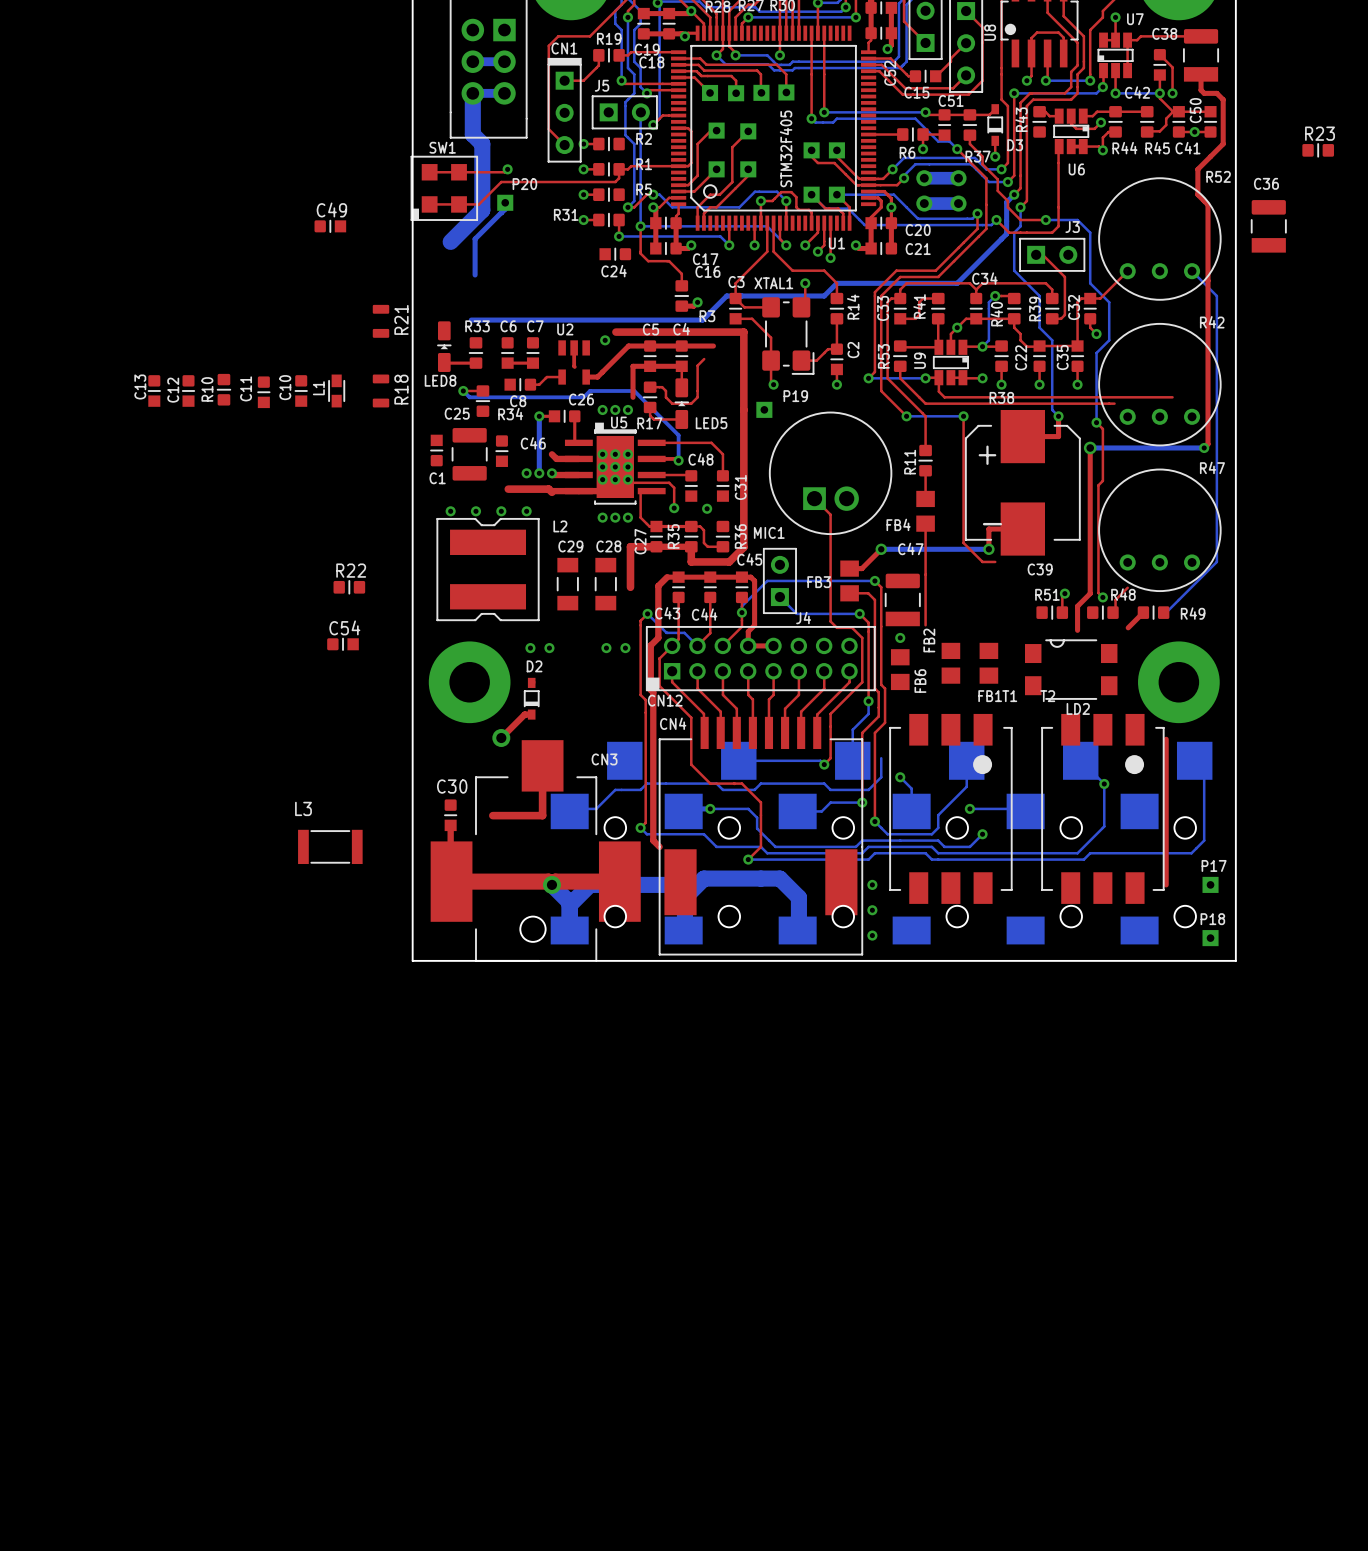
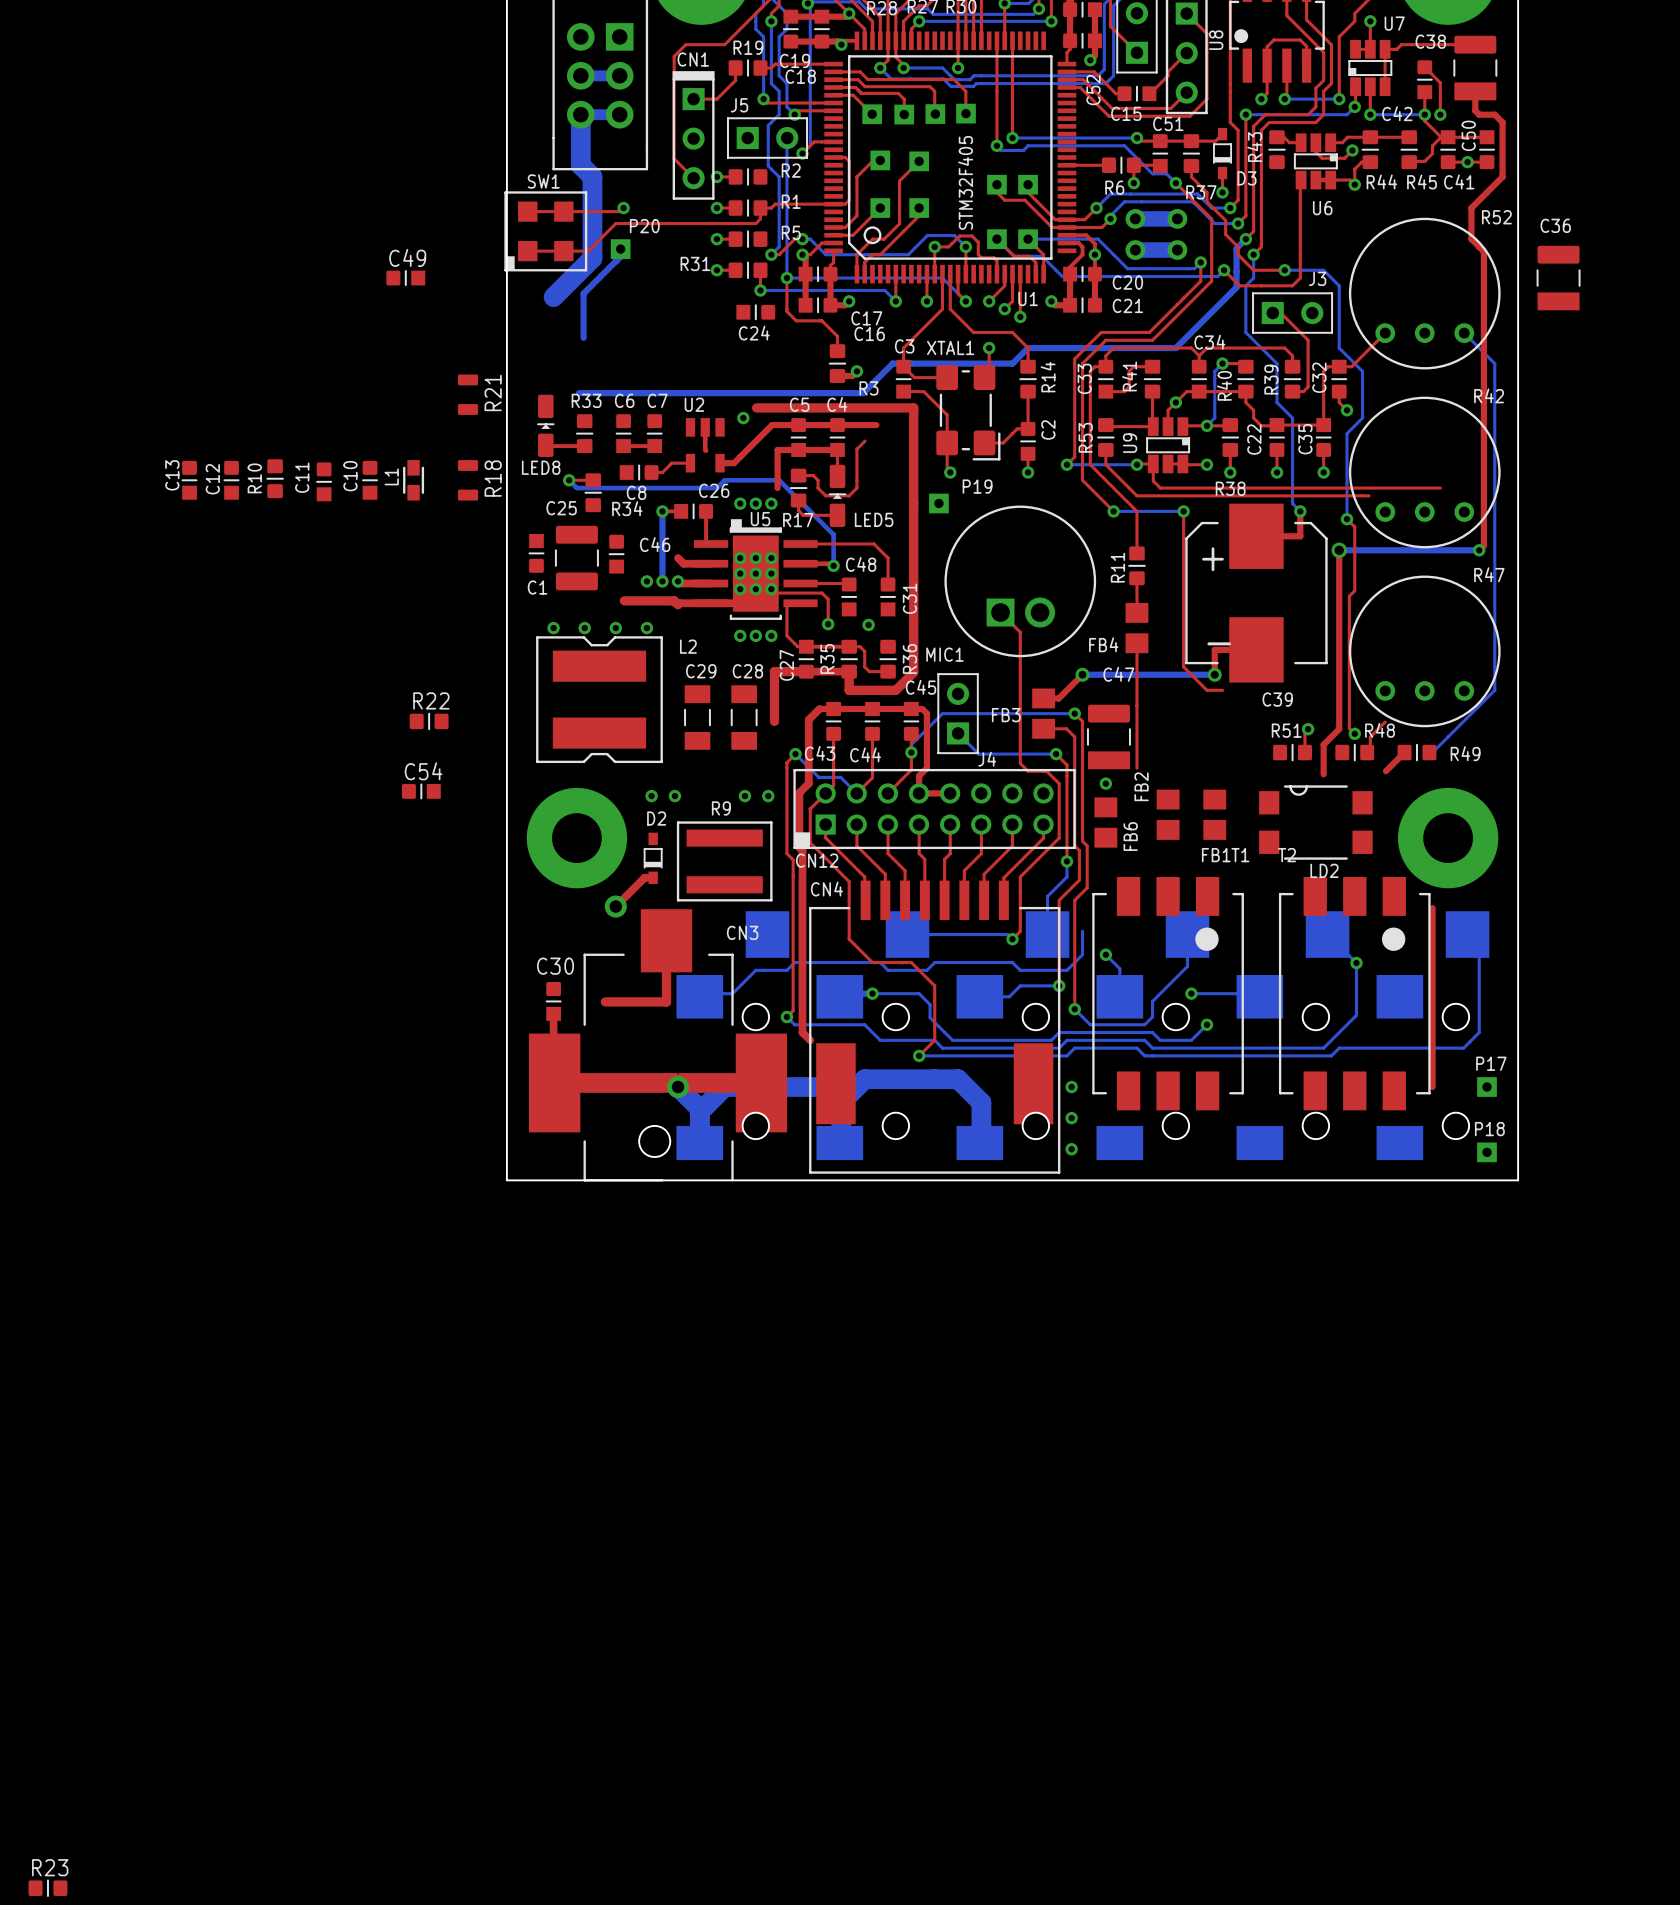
R23 position: (1318, 150) -> (47, 1888)
R9: none -> (724, 861)
L3: (330, 846) -> none

